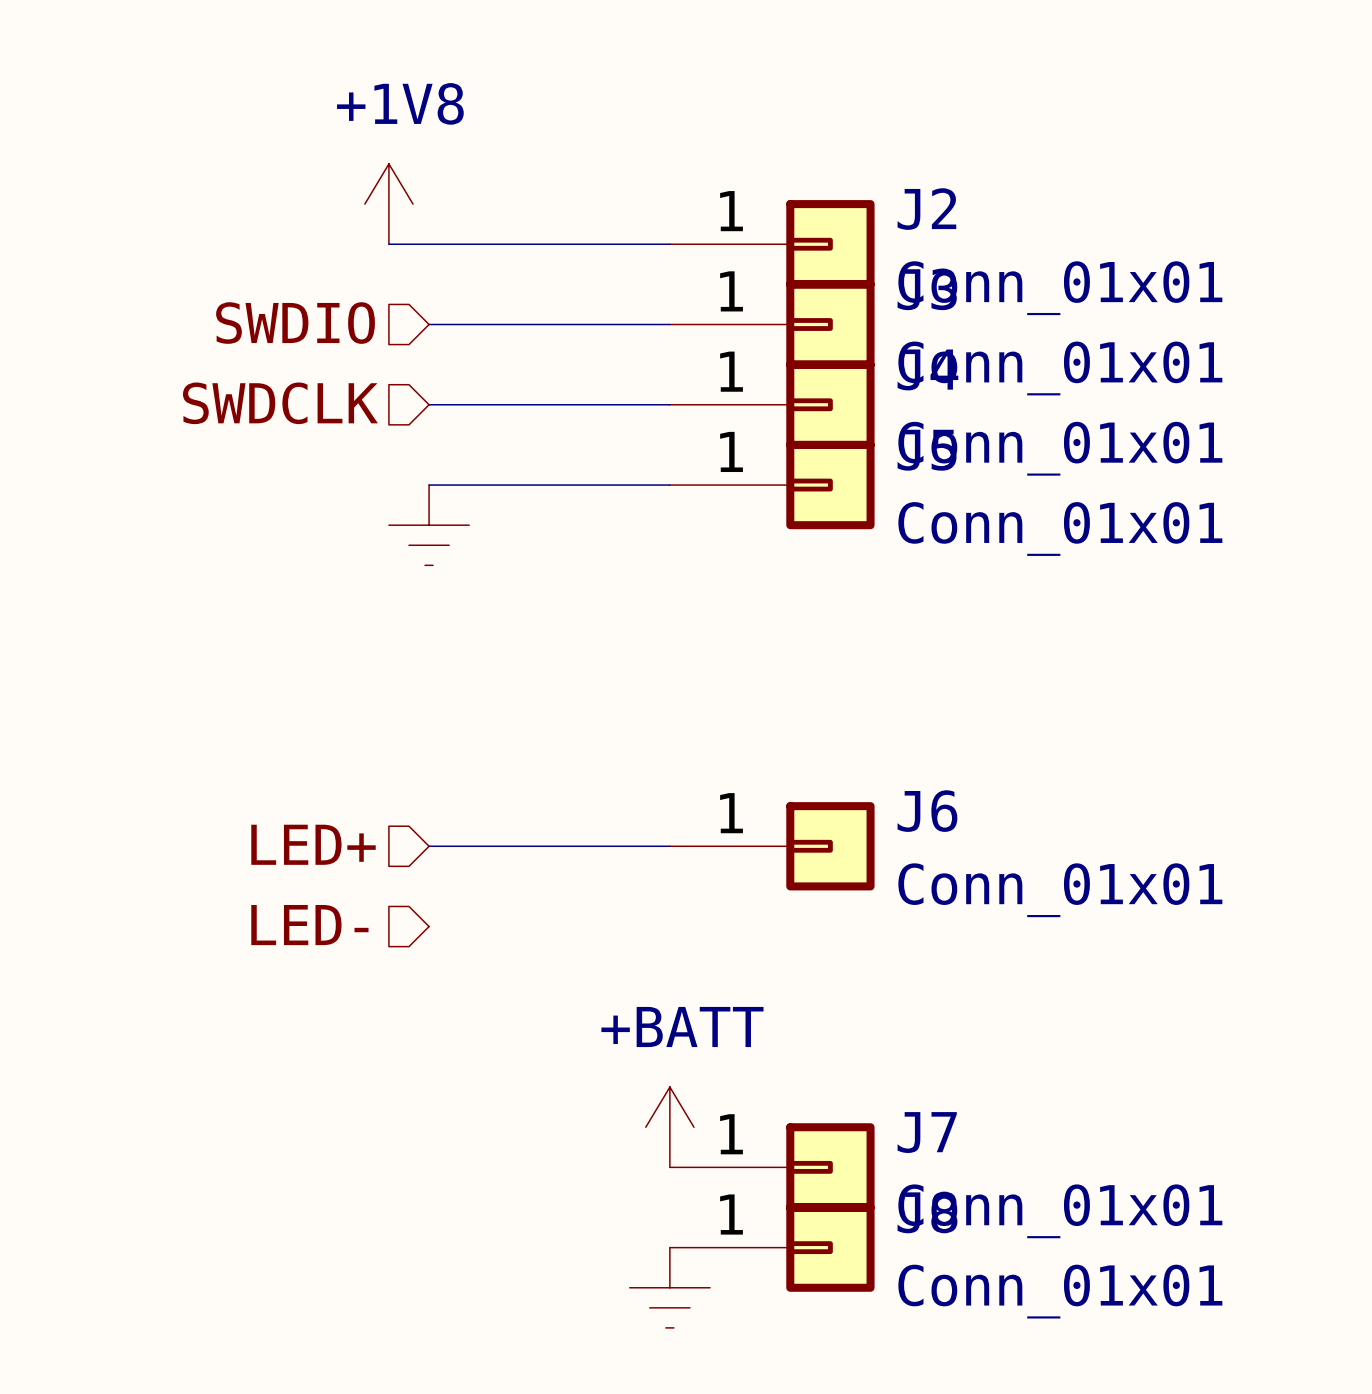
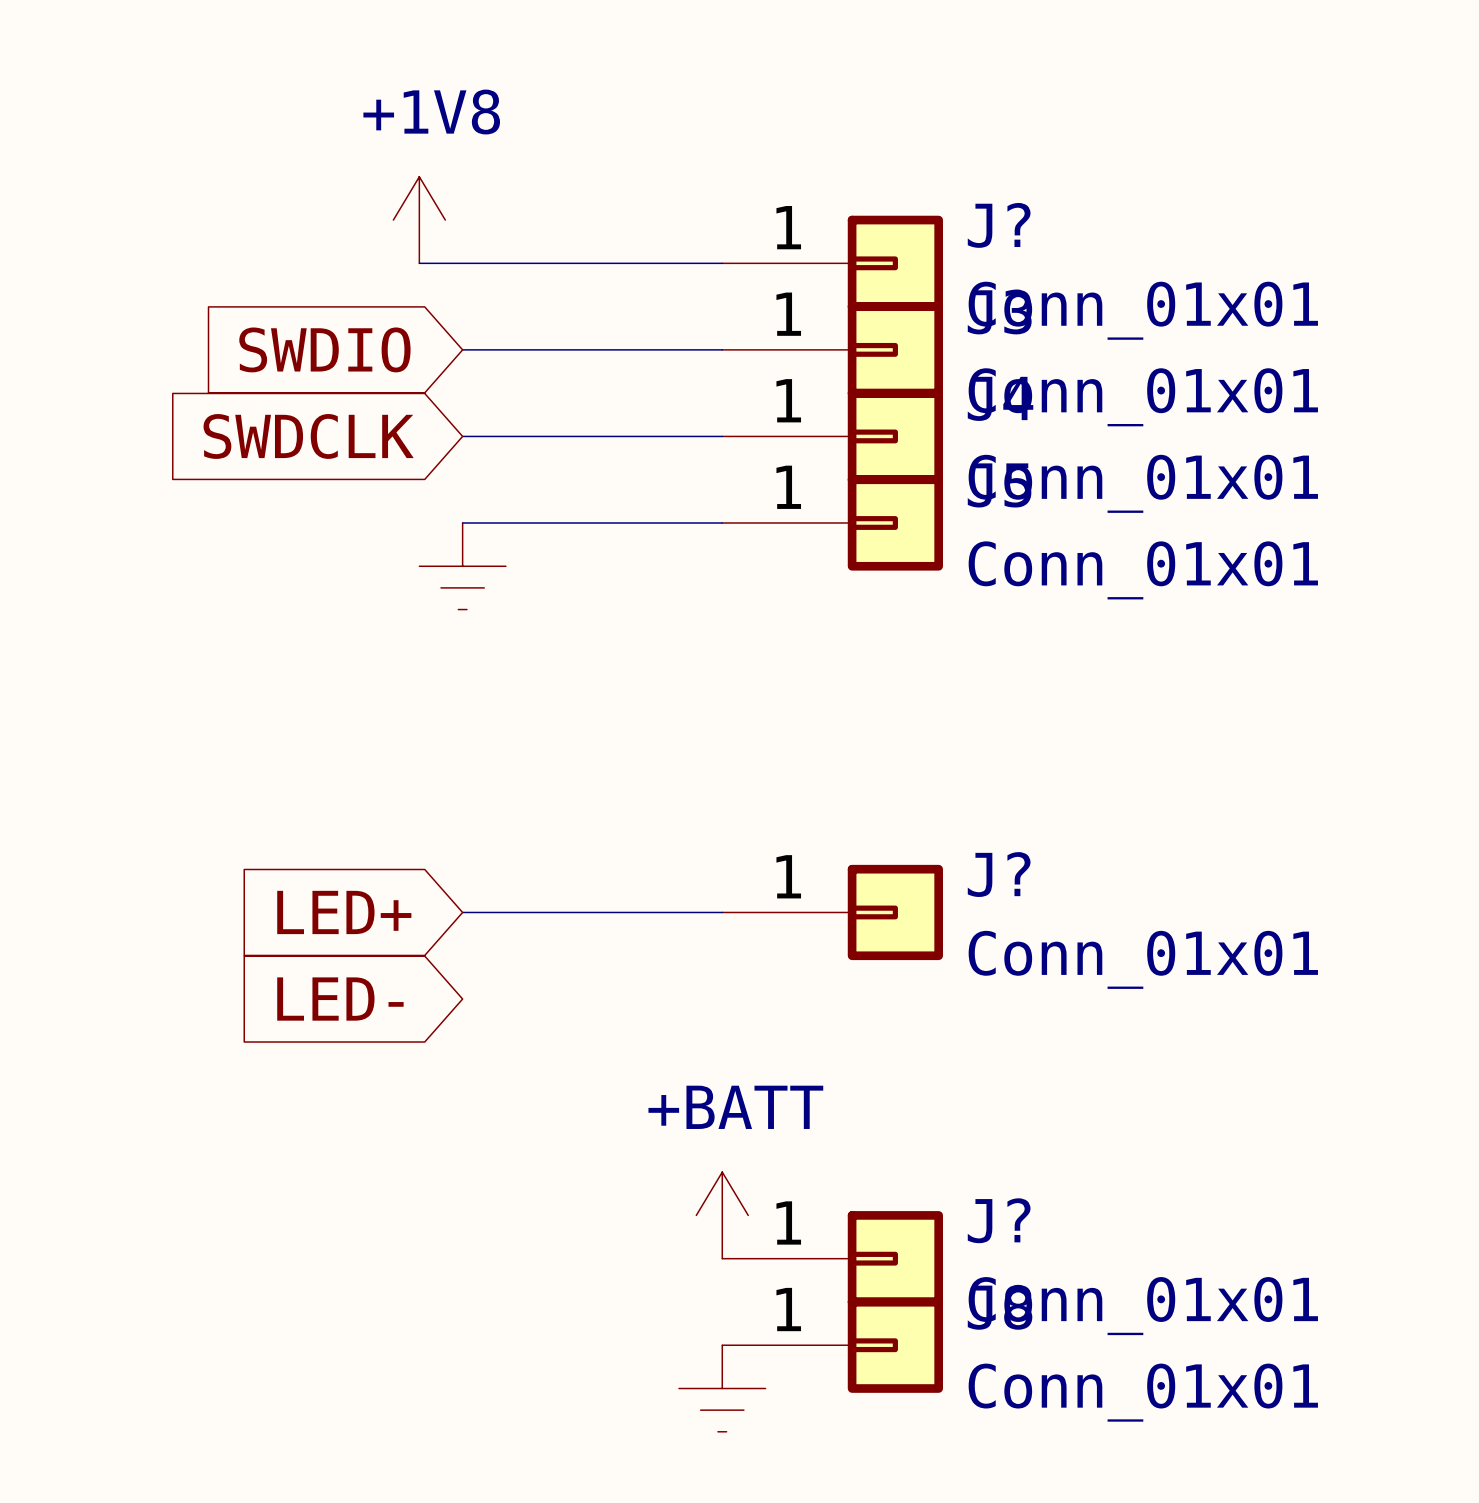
J2 name: J2 (926, 209) -> J? (999, 225)
hierarchical label: SWDIO (295, 323) -> none
global label: none -> SWDIO (324, 349)
hierarchical label: SWDCLK (280, 403) -> none
global label: none -> SWDCLK (308, 436)
J6 name: J6 (927, 811) -> J? (999, 874)
hierarchical label: LED+ (313, 844) -> none
global label: none -> LED+ (344, 912)
hierarchical label: LED- (309, 925) -> none
global label: none -> LED- (340, 999)
J7 name: J7 (927, 1132) -> J? (999, 1220)

